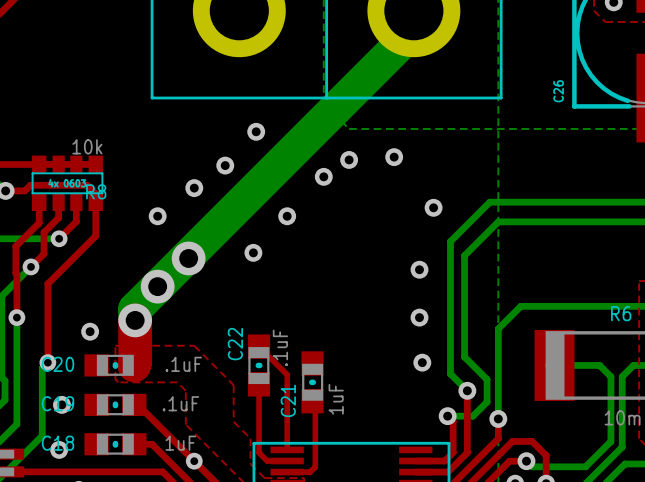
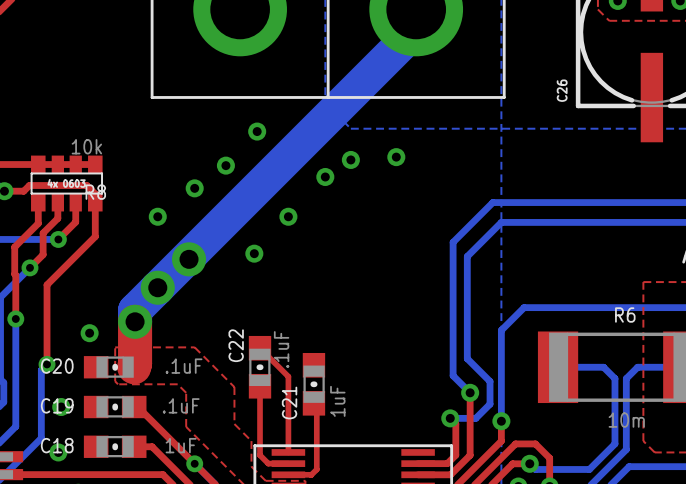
via: (433, 207) -> none
via: (419, 269) -> none
via: (419, 317) -> none
via: (422, 362) -> none

